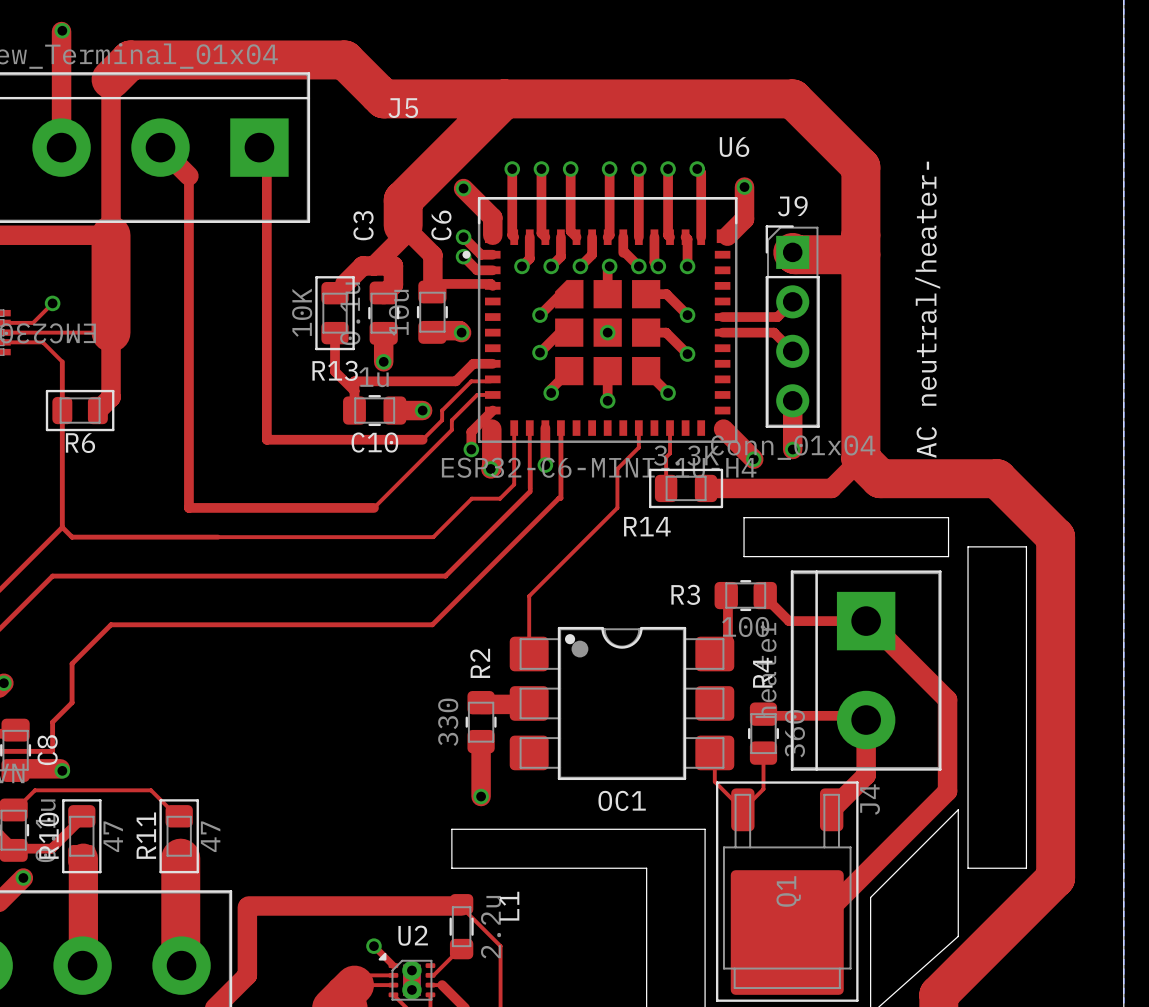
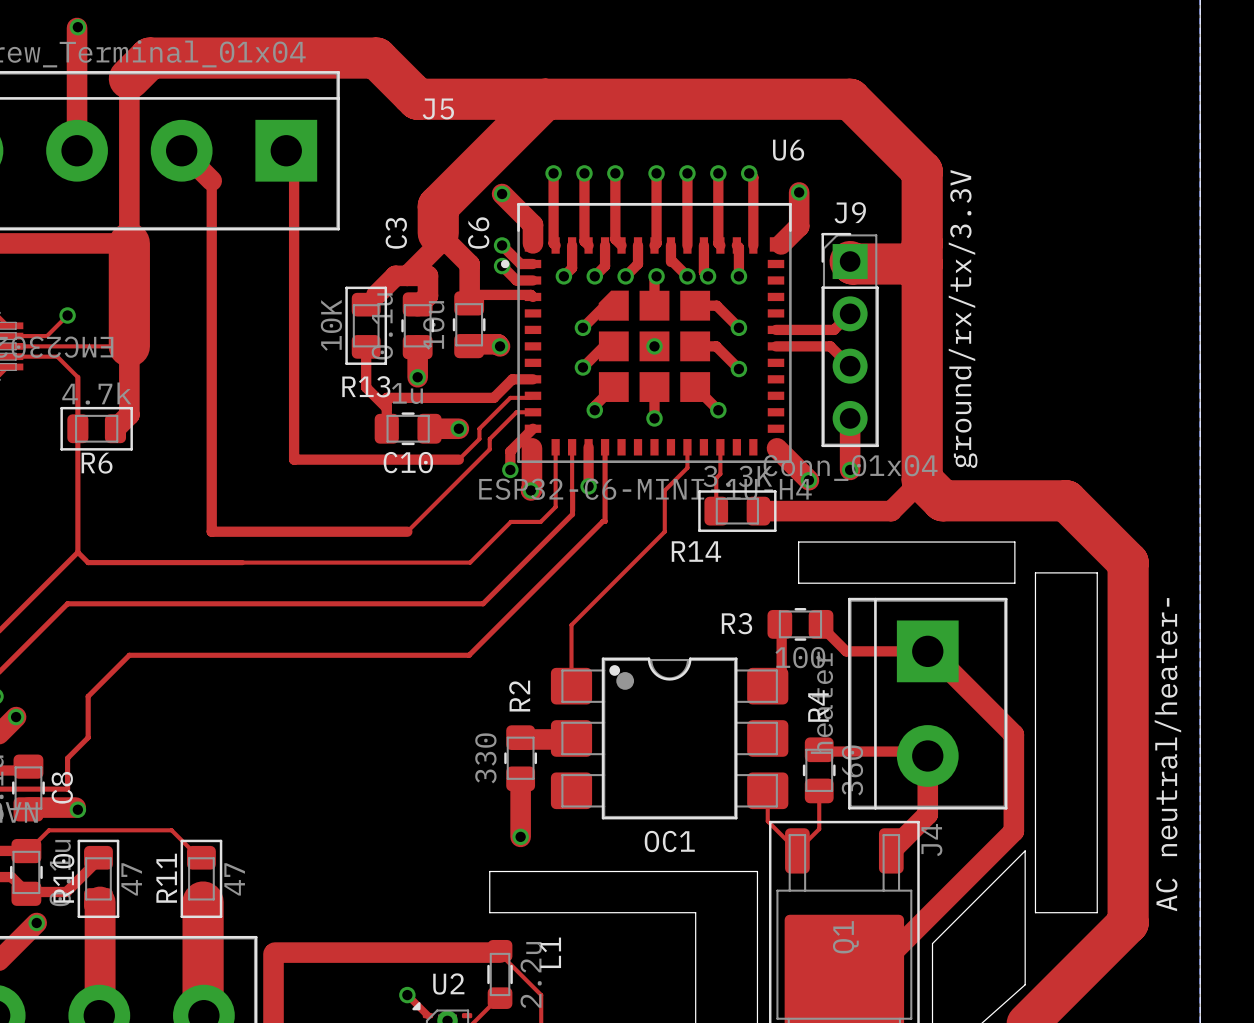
text: none -> ground/rx/tx/3.3V (963, 319)
text position: AC neutral/heater- (927, 309) -> AC neutral/heater- (1167, 754)
R6 value: none -> 4.7k (96, 393)

